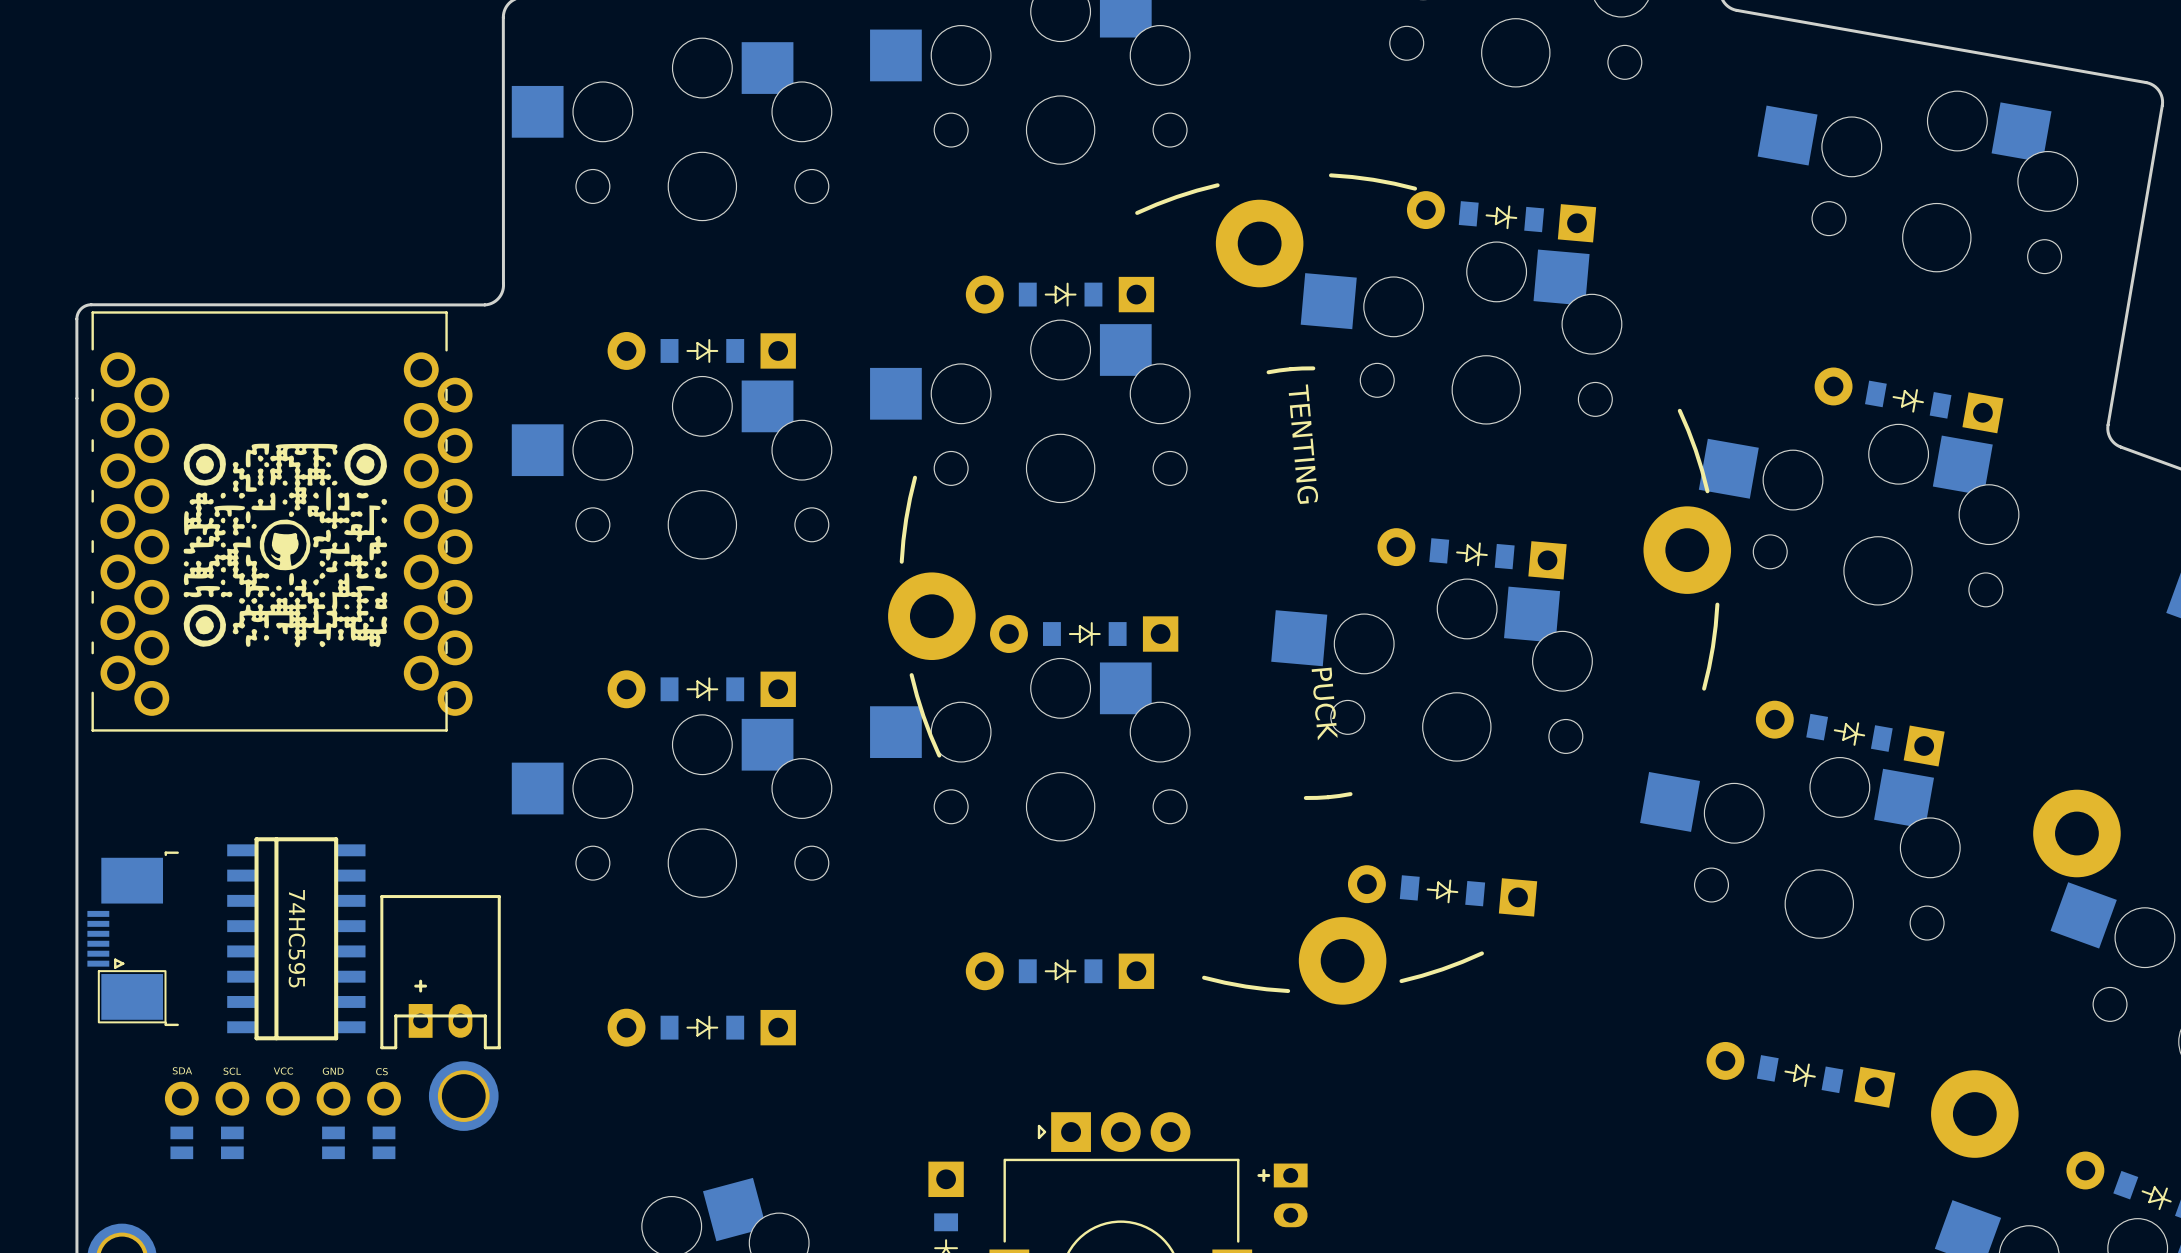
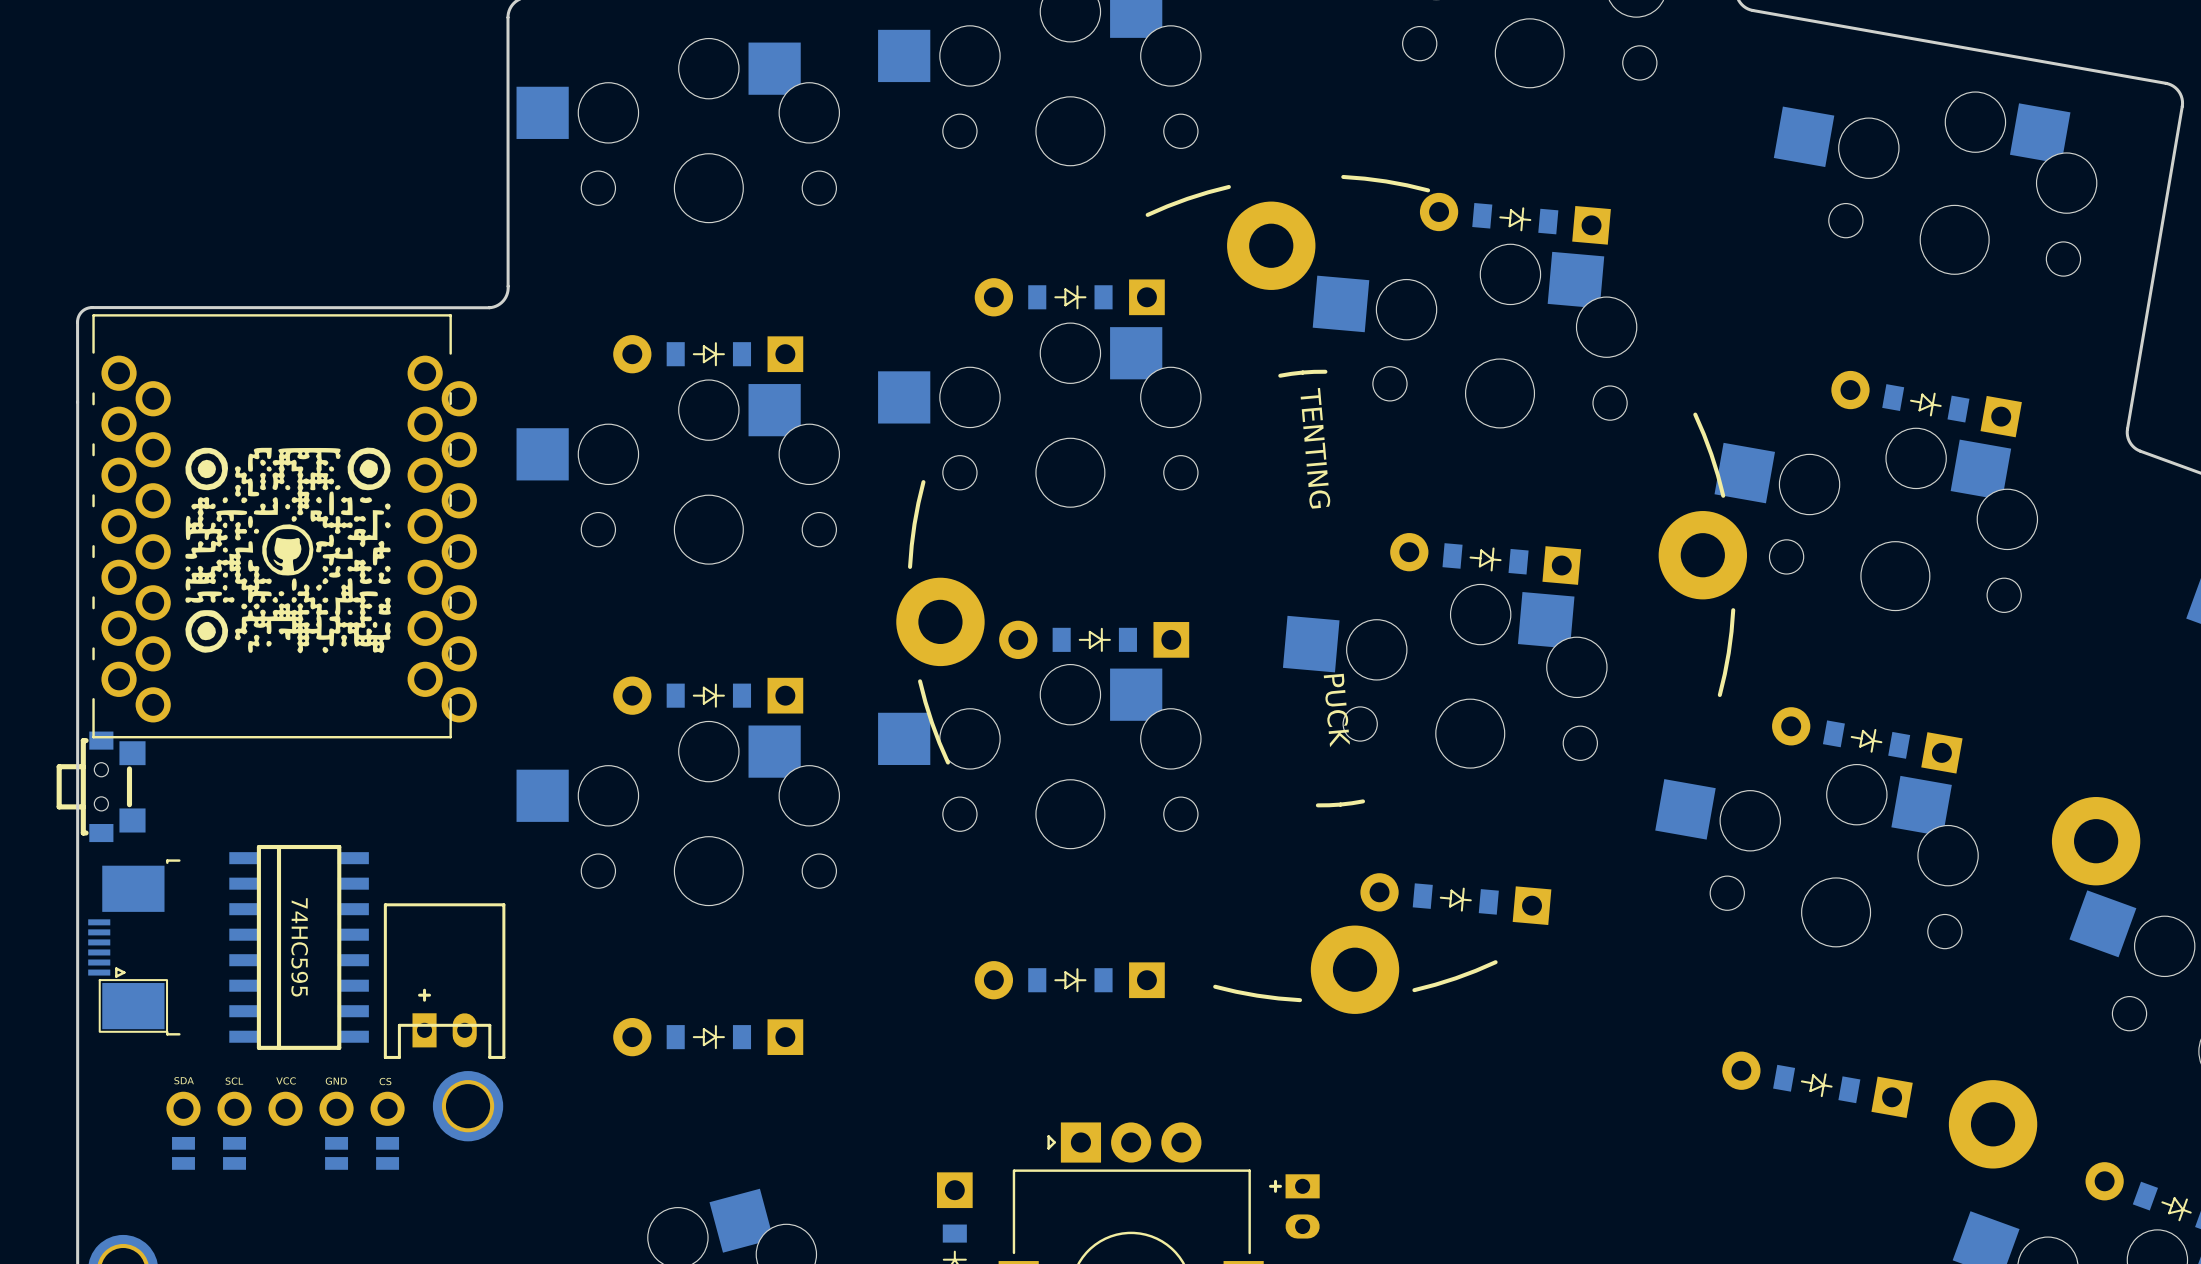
part: none -> (101, 786)

